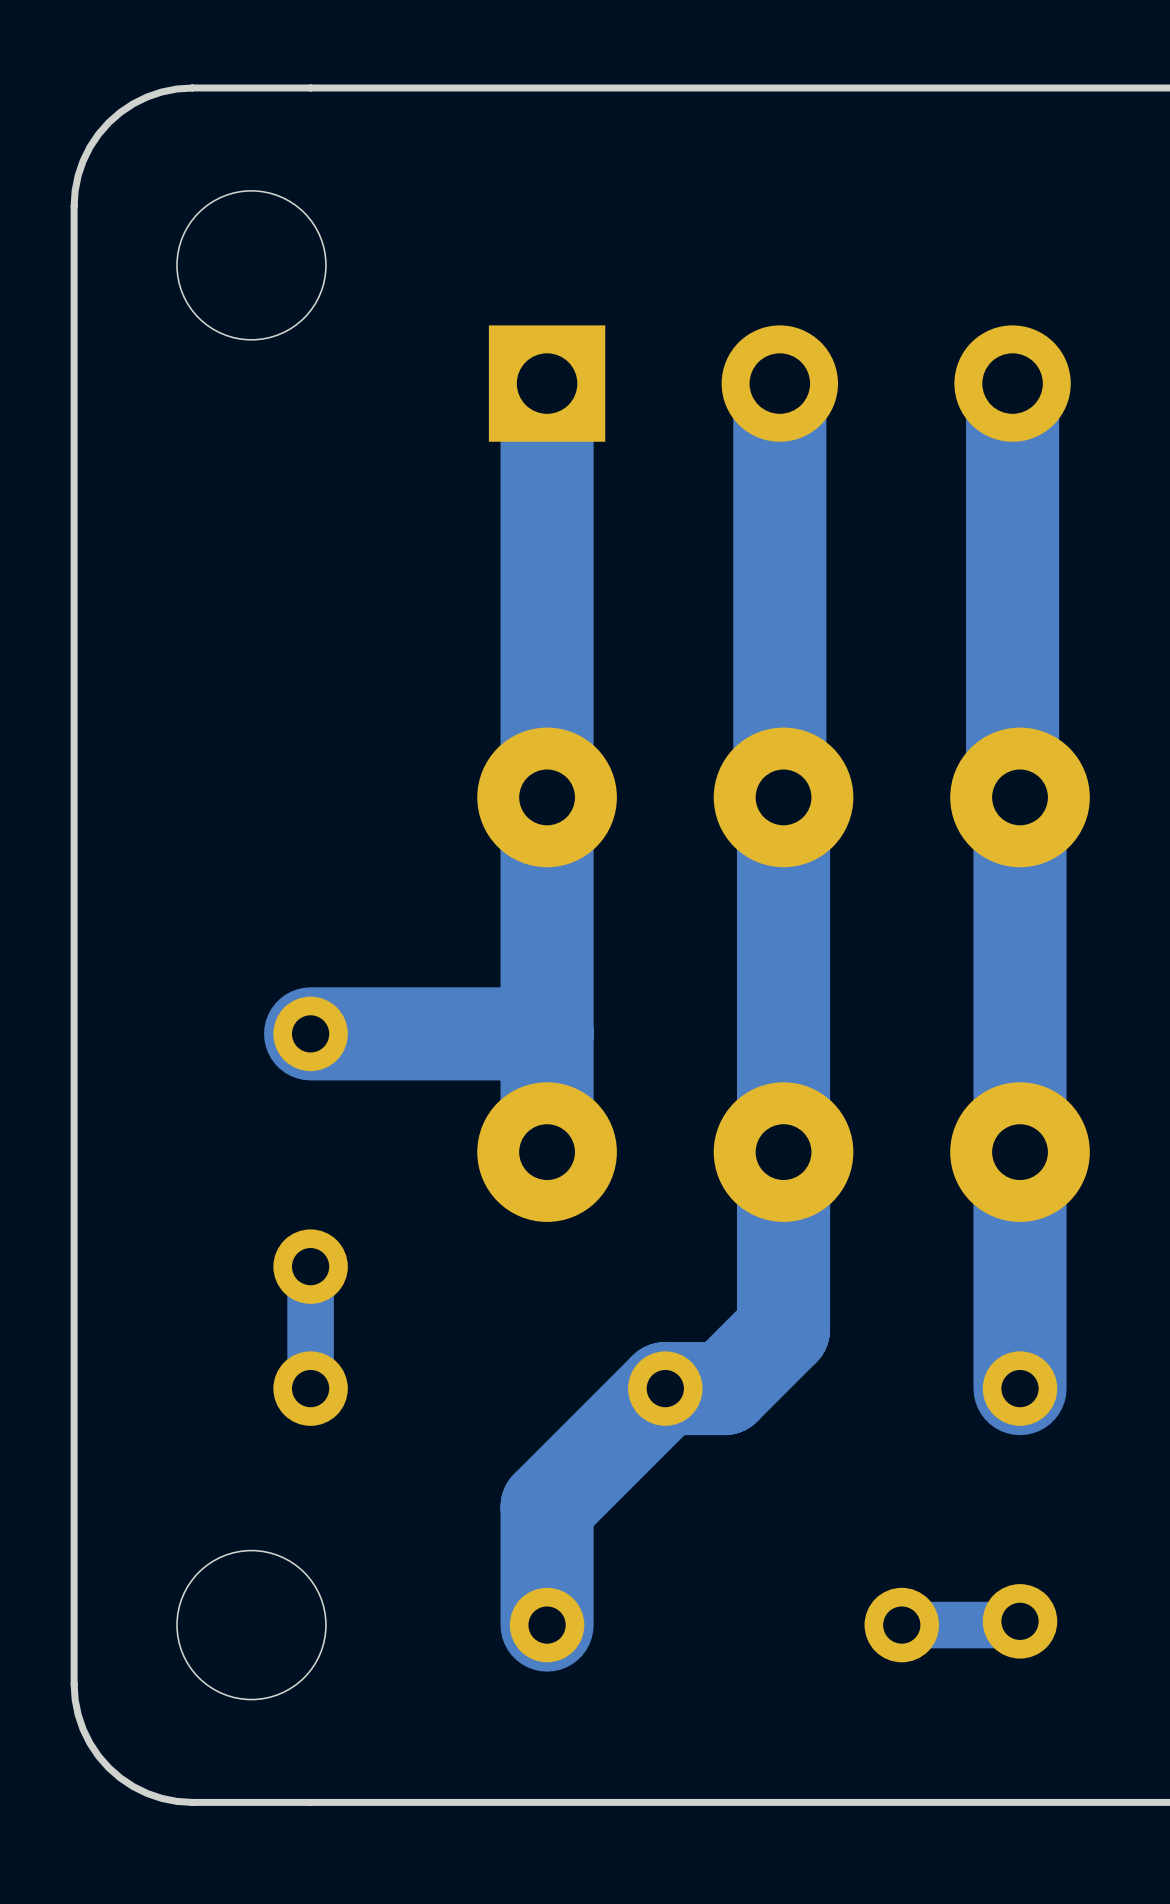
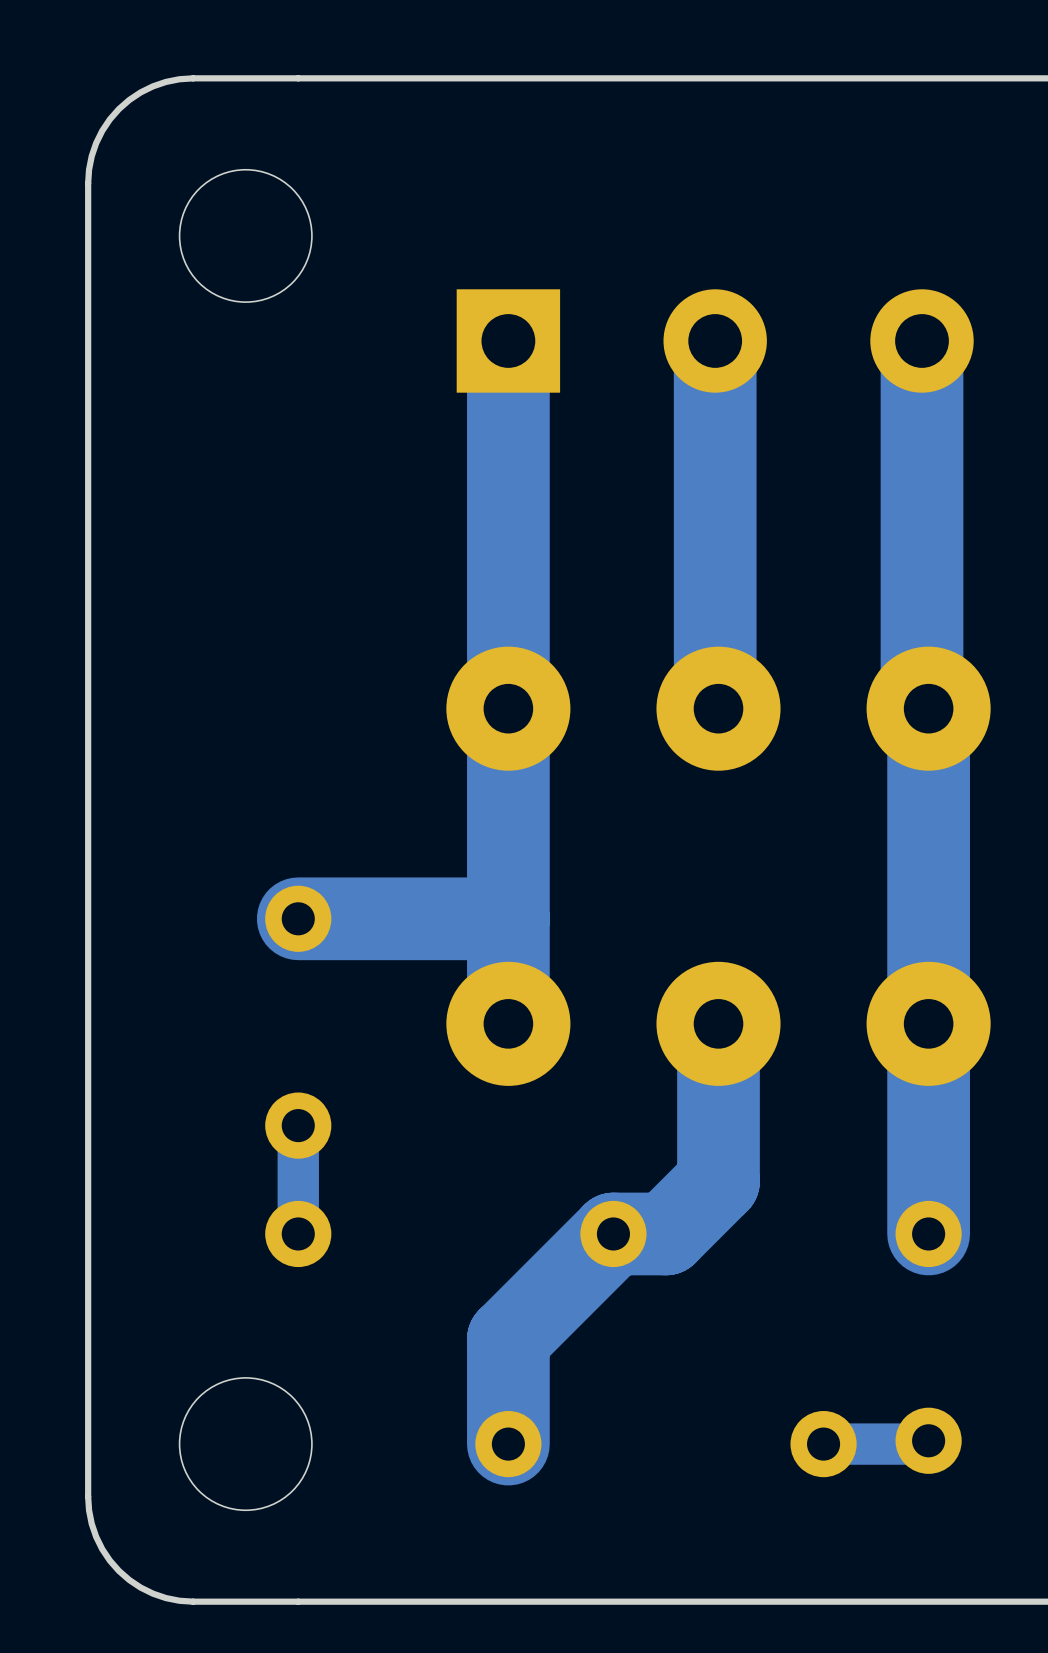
bottom track: (783, 797) (783, 1152) -> none

